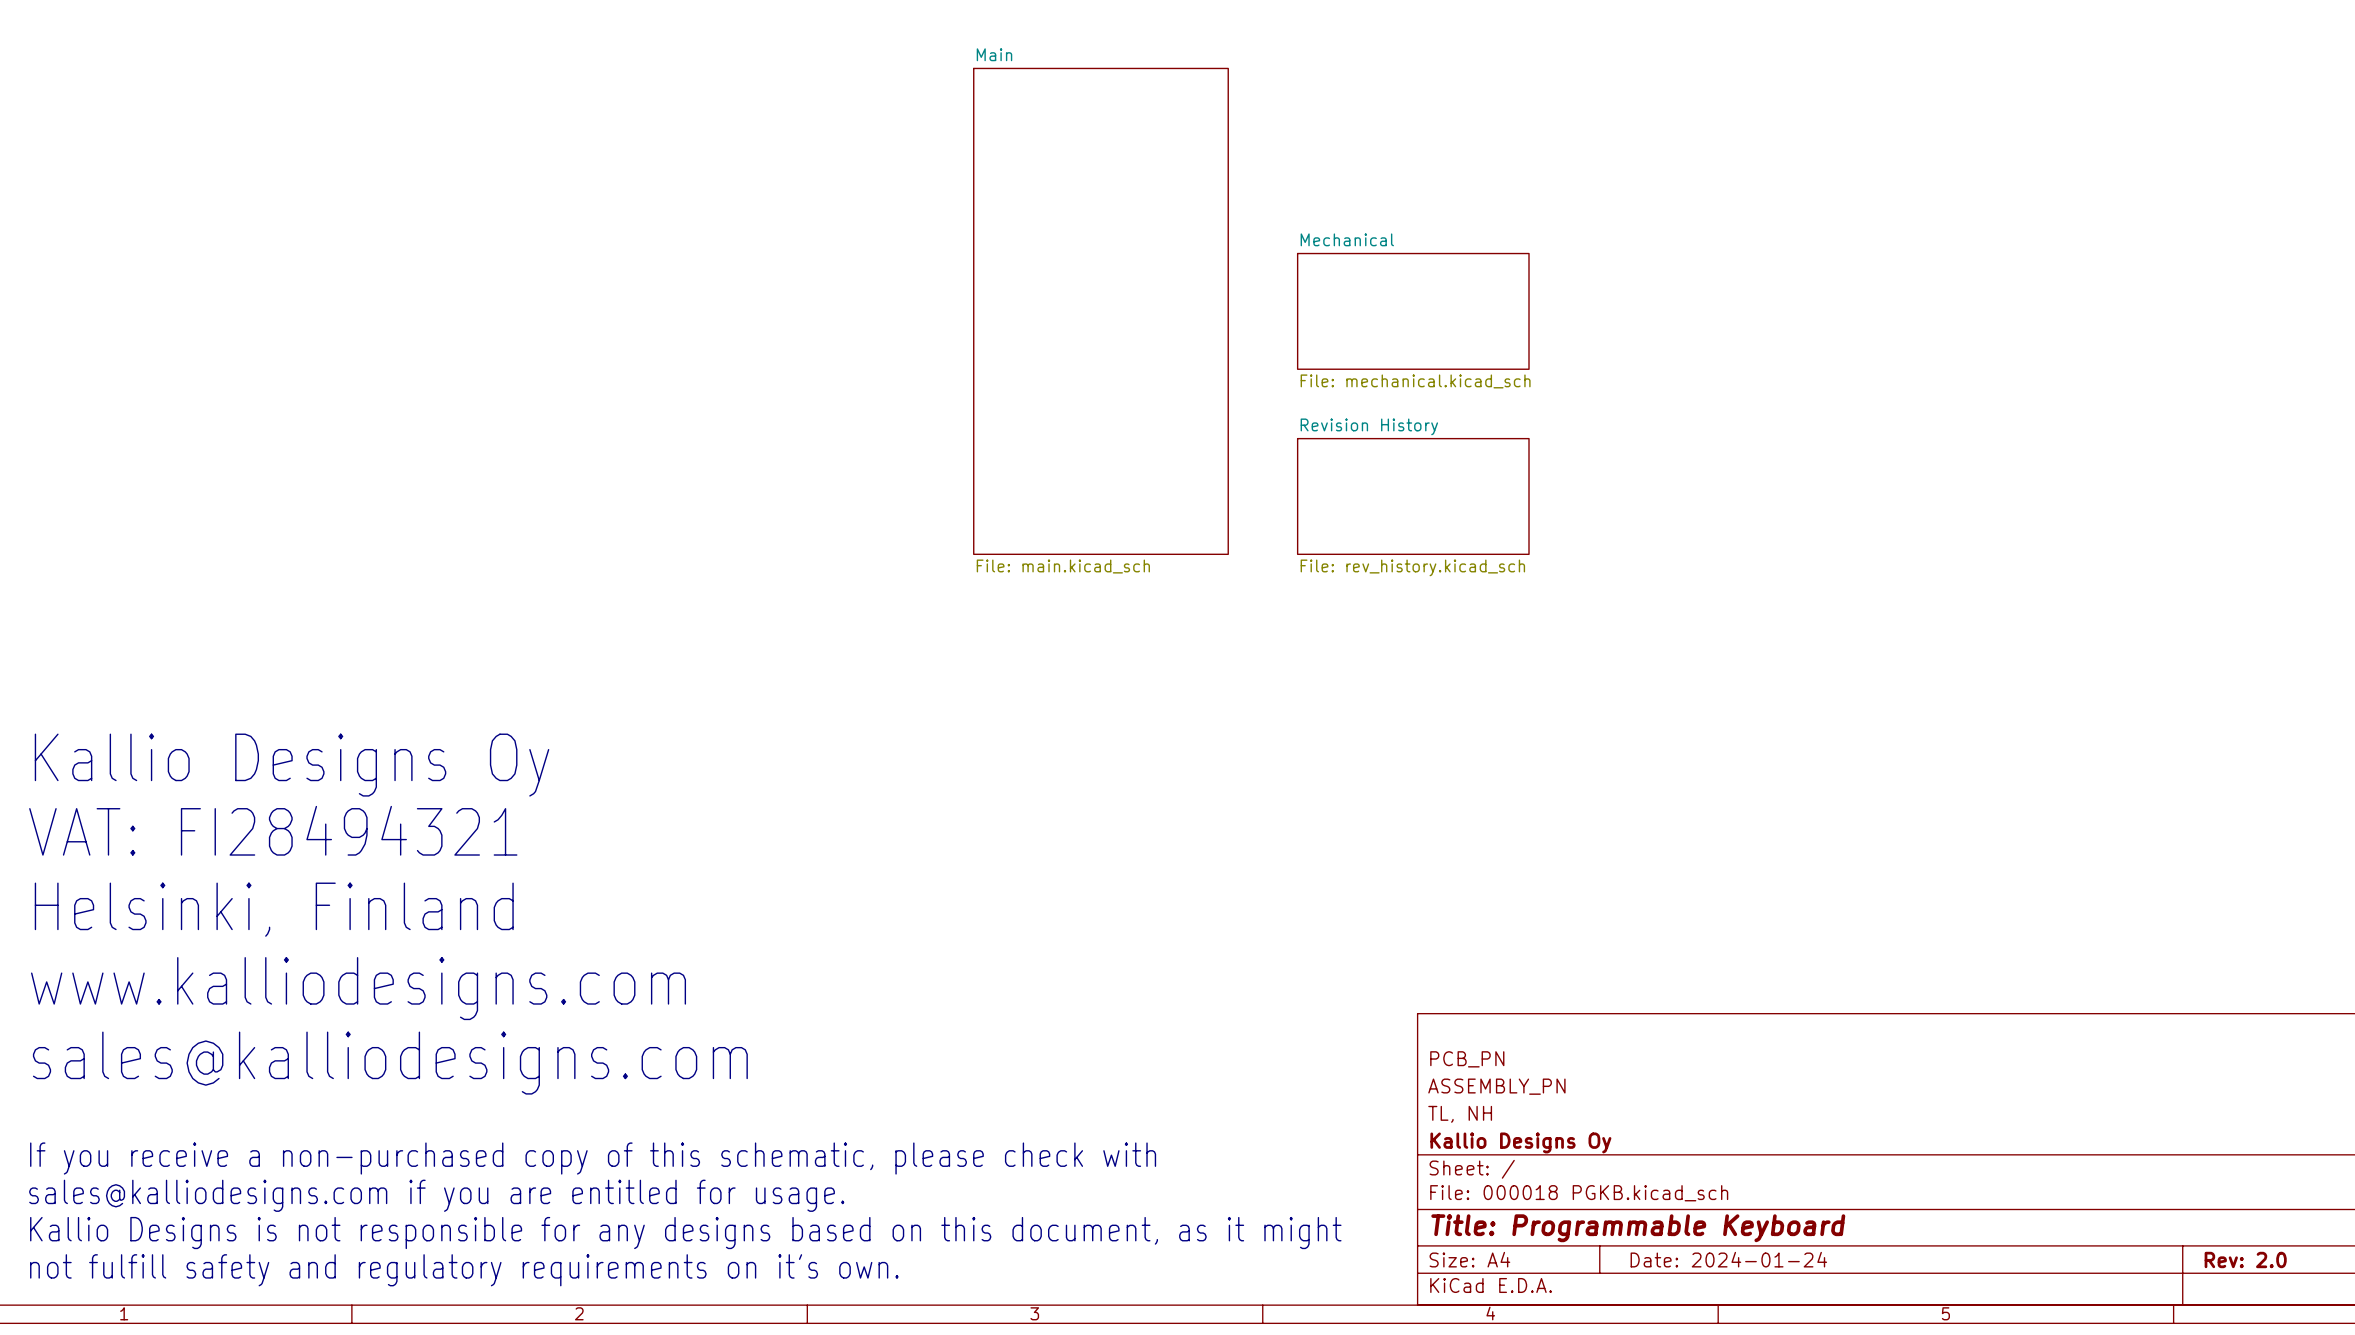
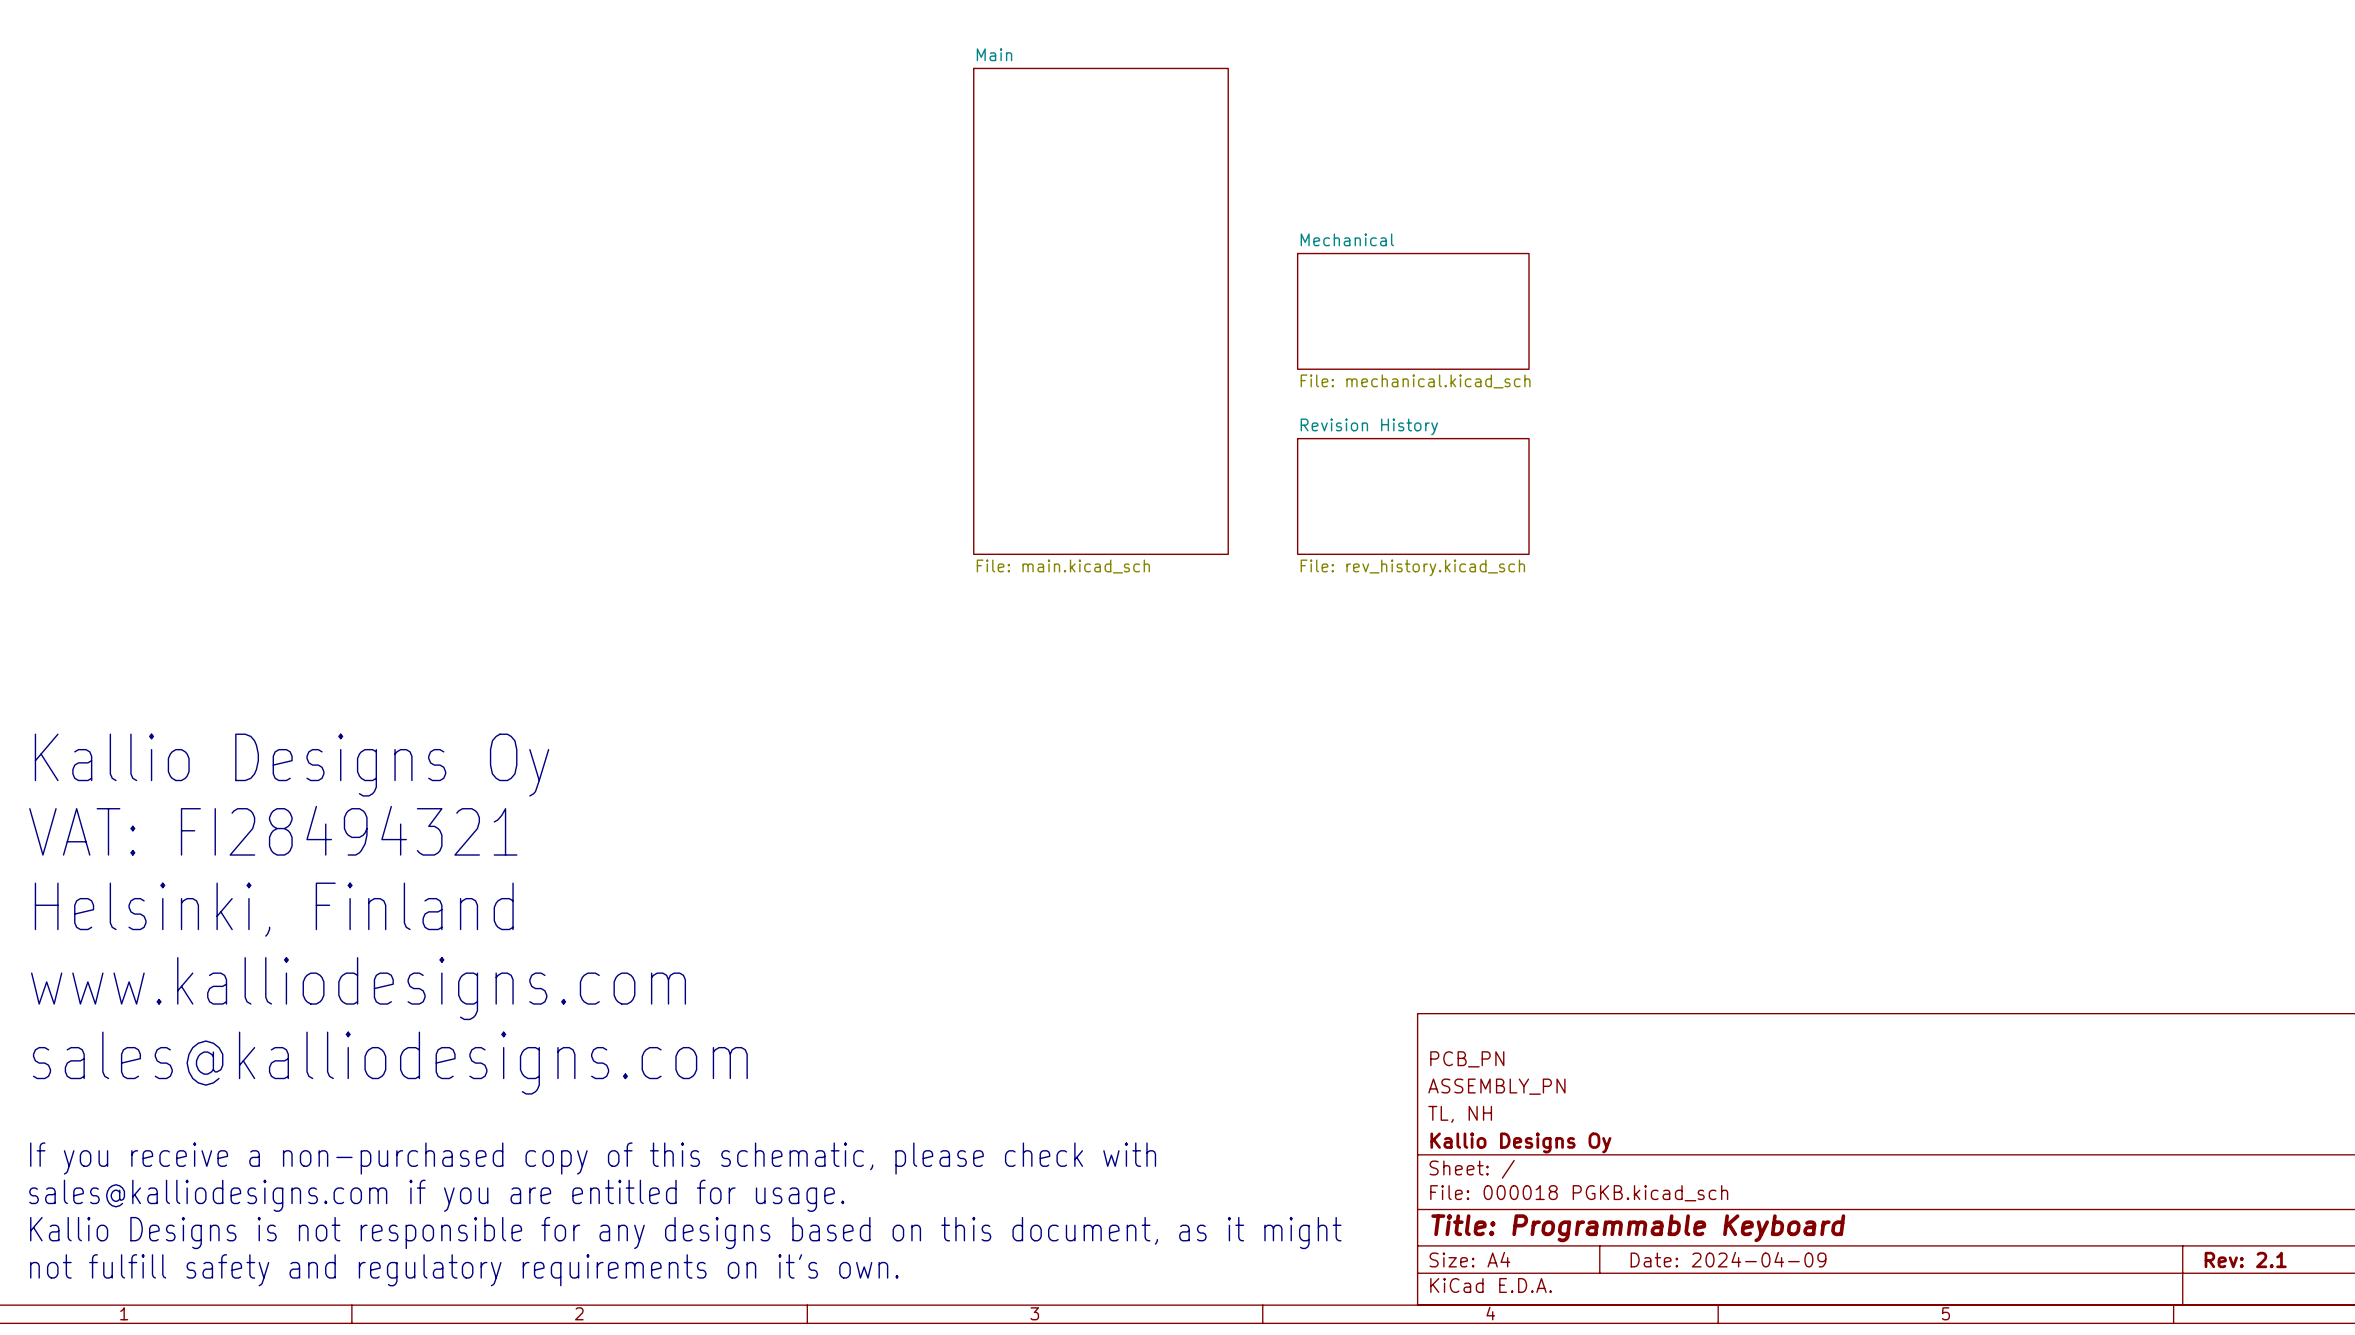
title block: Date: 2024-01-24 (1728, 1259) -> Date: 2024-04-09 (1728, 1259)
title block: Rev: 2.0 (2245, 1259) -> Rev: 2.1 (2245, 1259)

